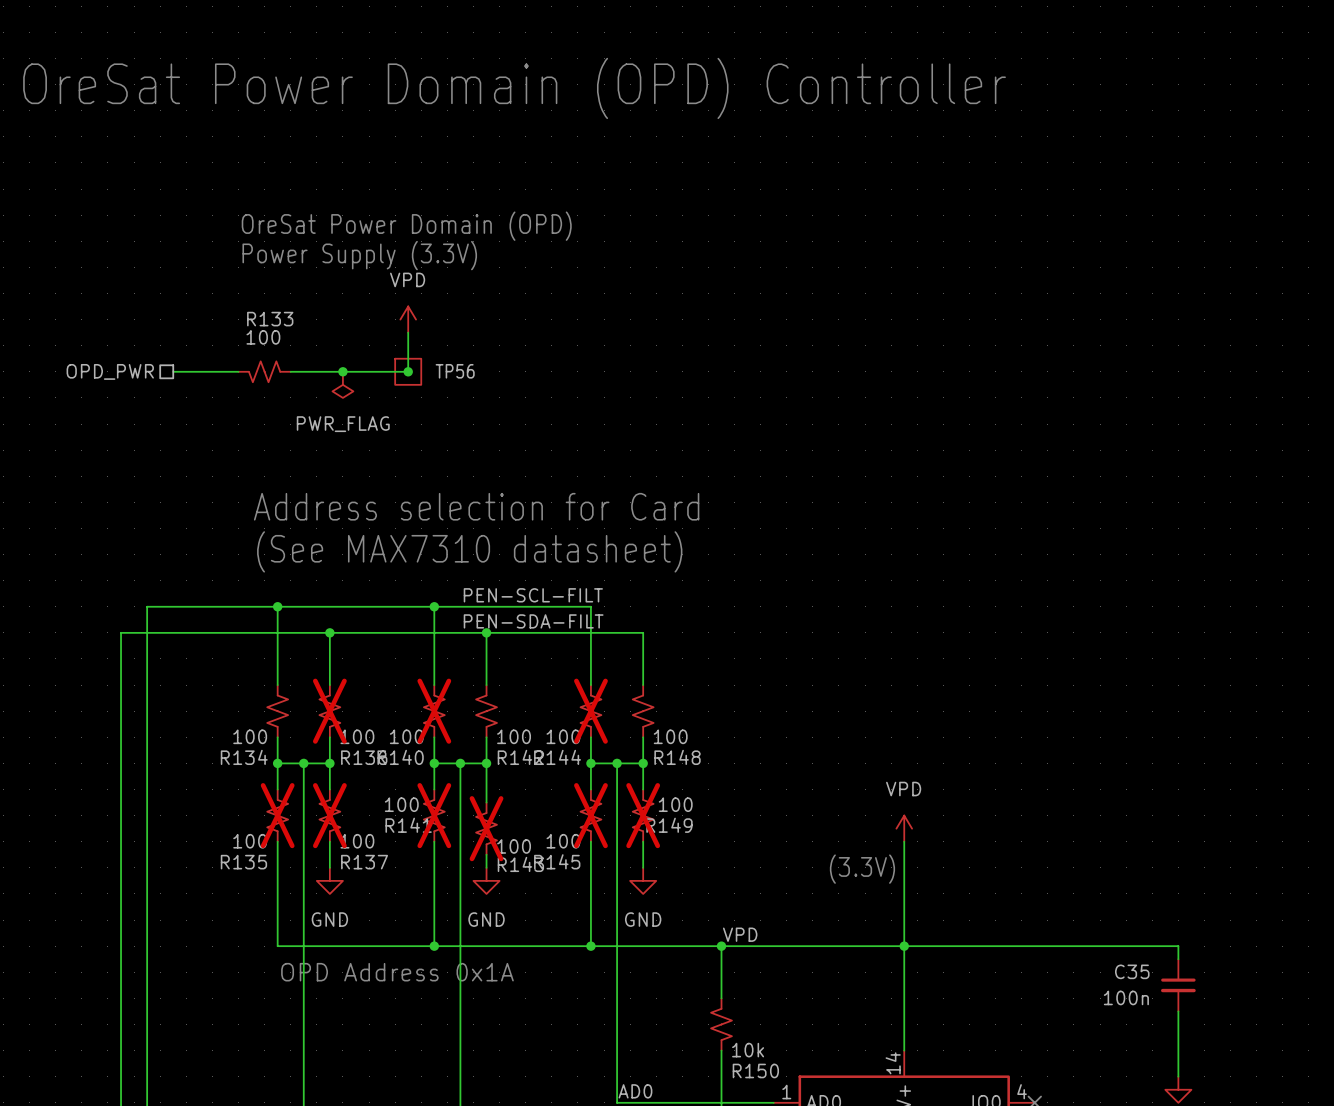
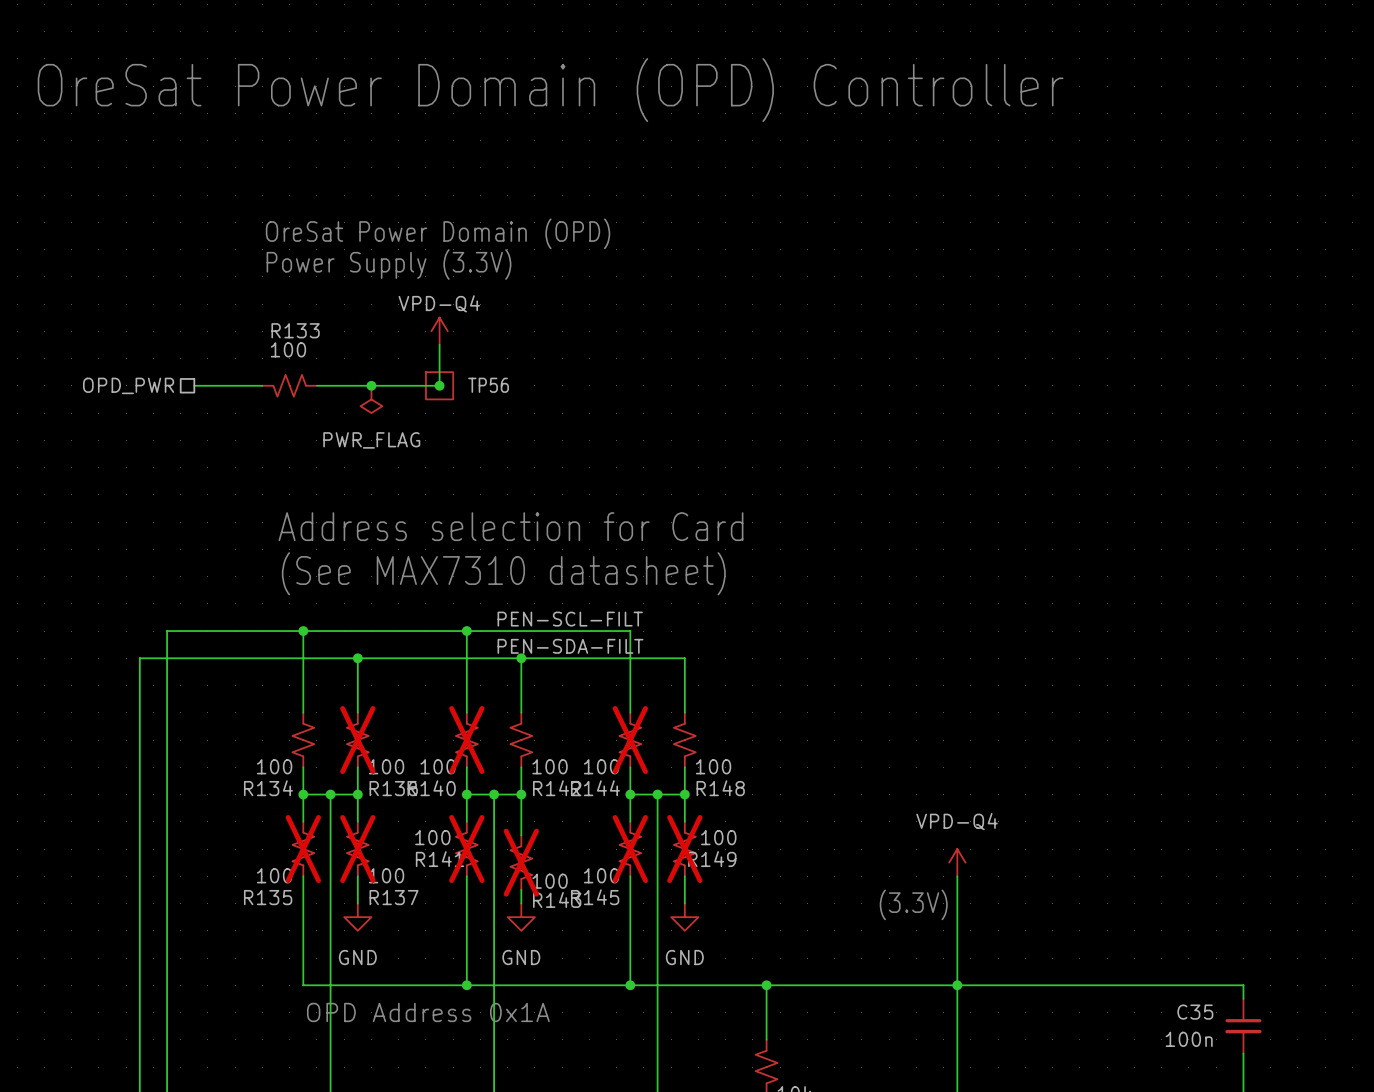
power symbol: VPD (408, 319) -> VPD-Q4 (439, 331)
power symbol: VPD (904, 828) -> VPD-Q4 (957, 862)
label: VPD (740, 934) -> none

